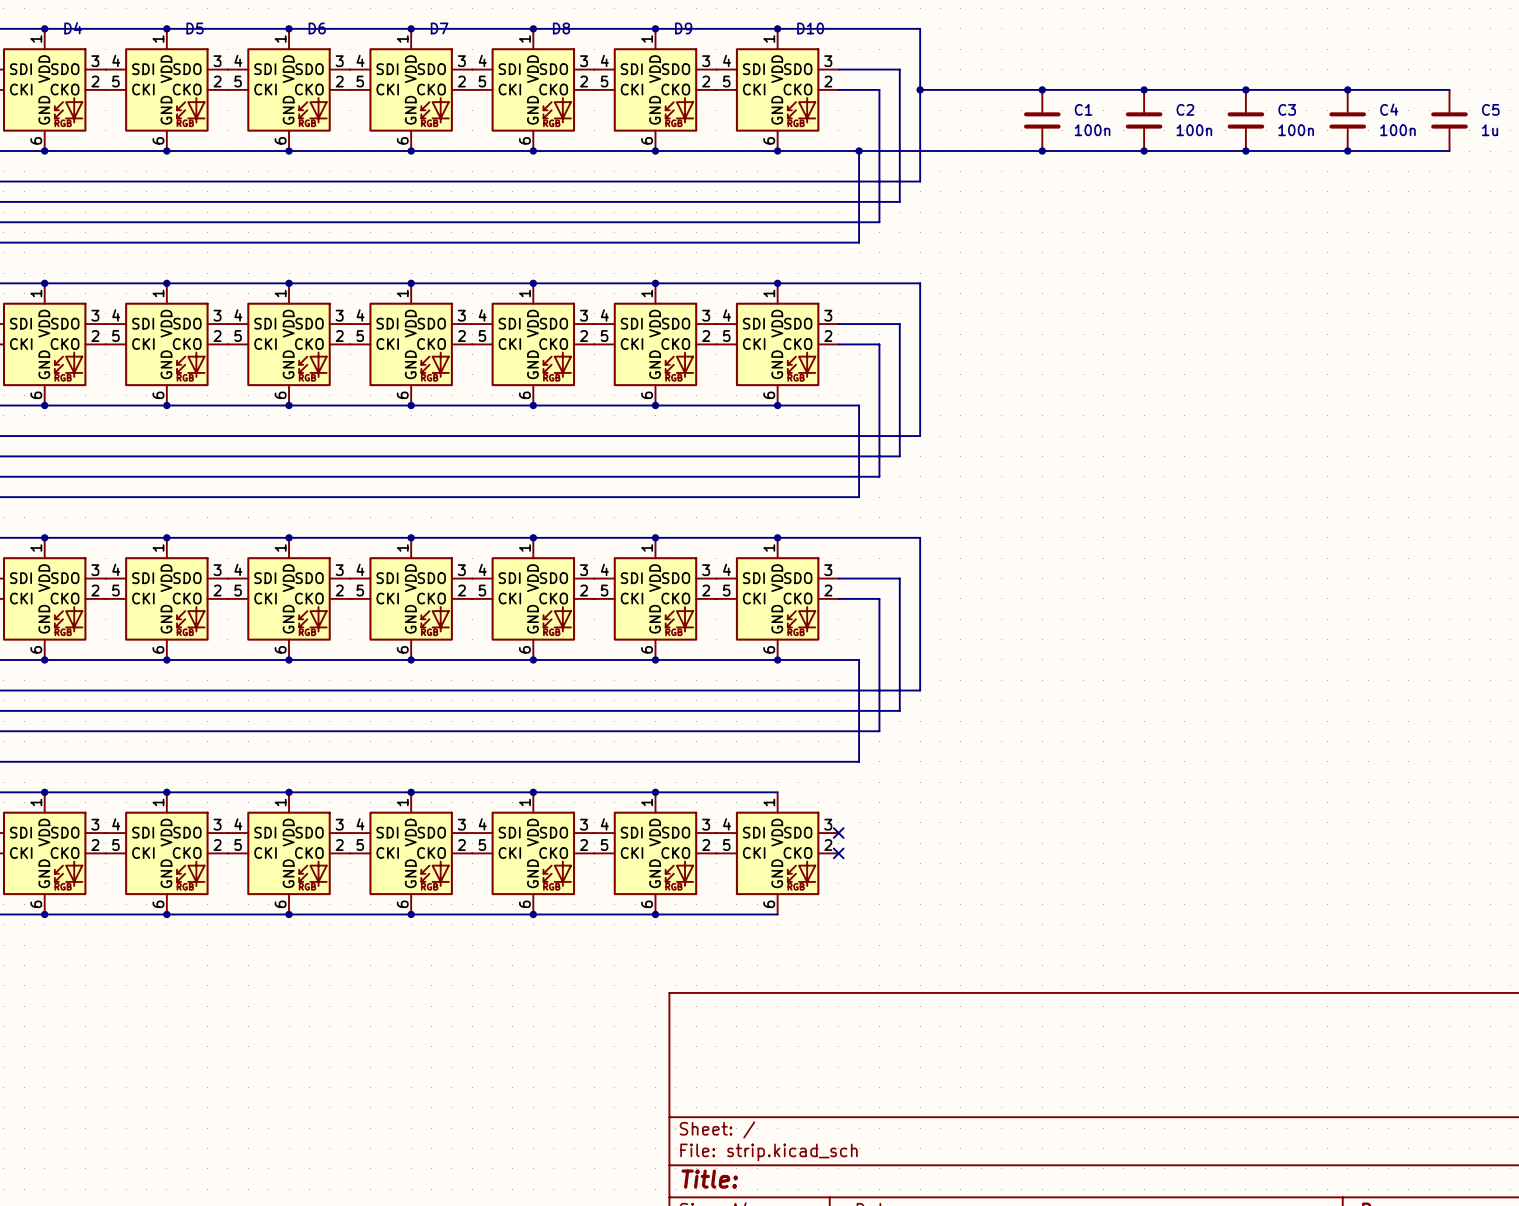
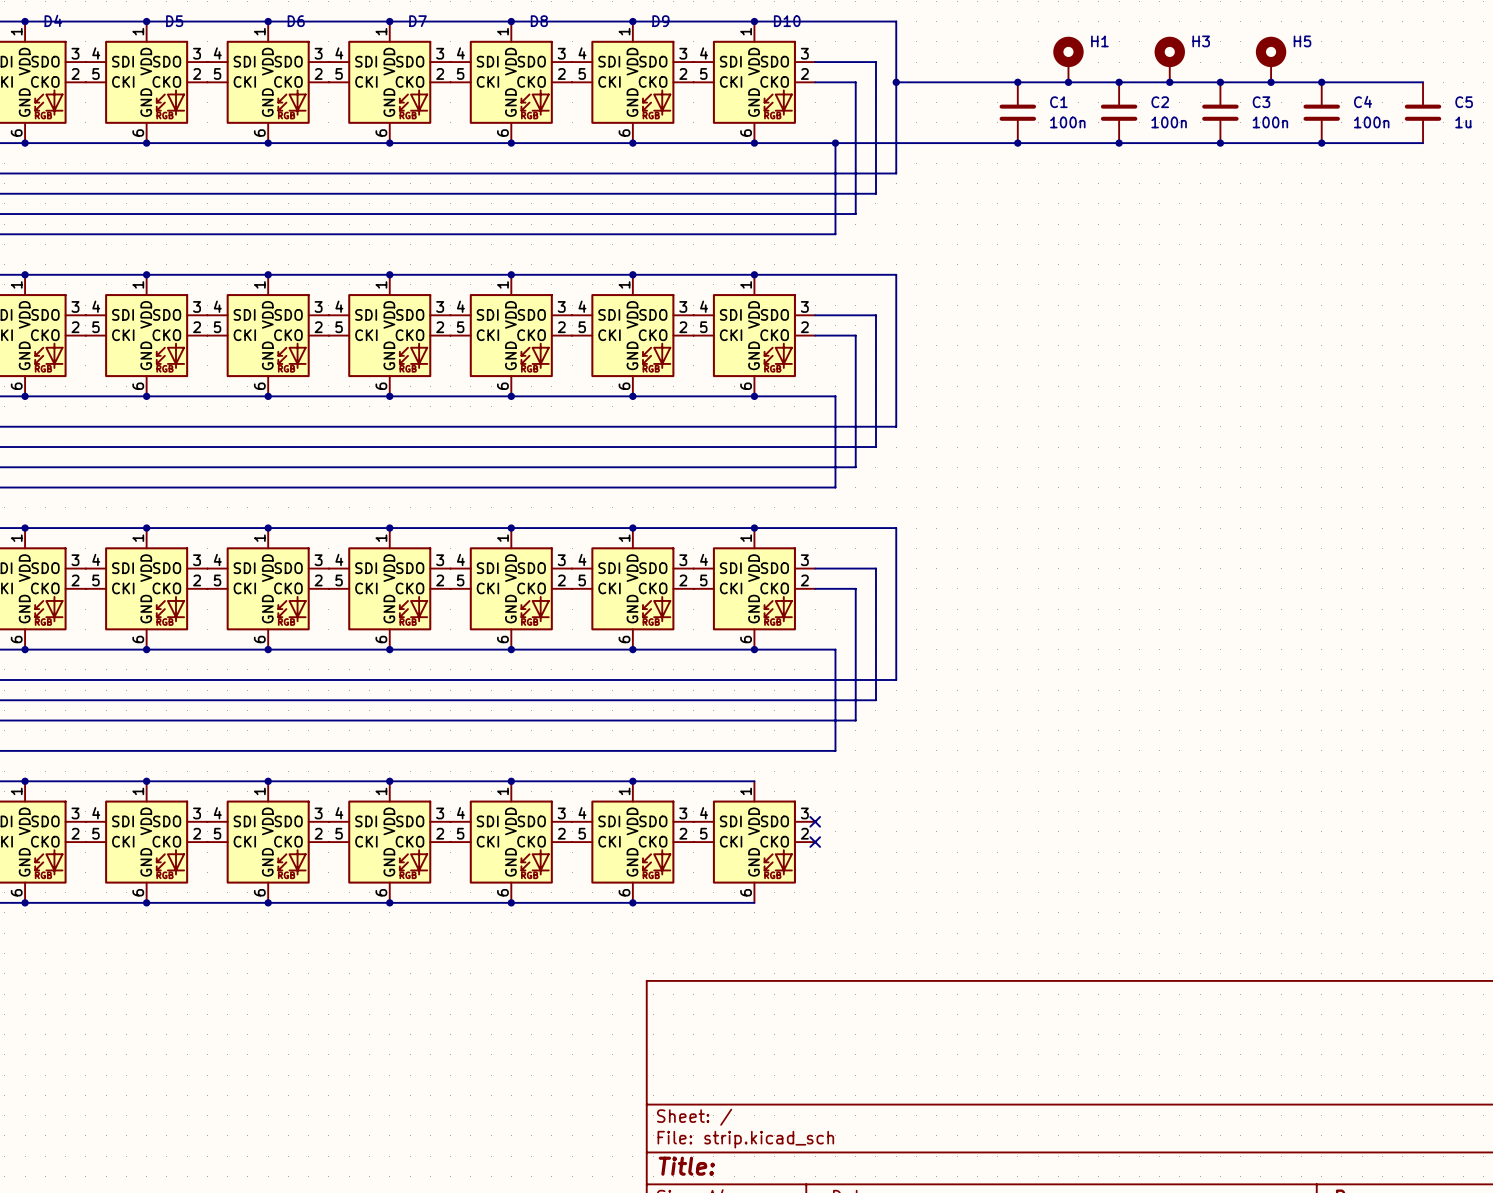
H1: none -> (1068, 59)
H3: none -> (1169, 59)
H5: none -> (1271, 59)
junction: none -> (1068, 82)
junction: none -> (1169, 82)
junction: none -> (1271, 82)

